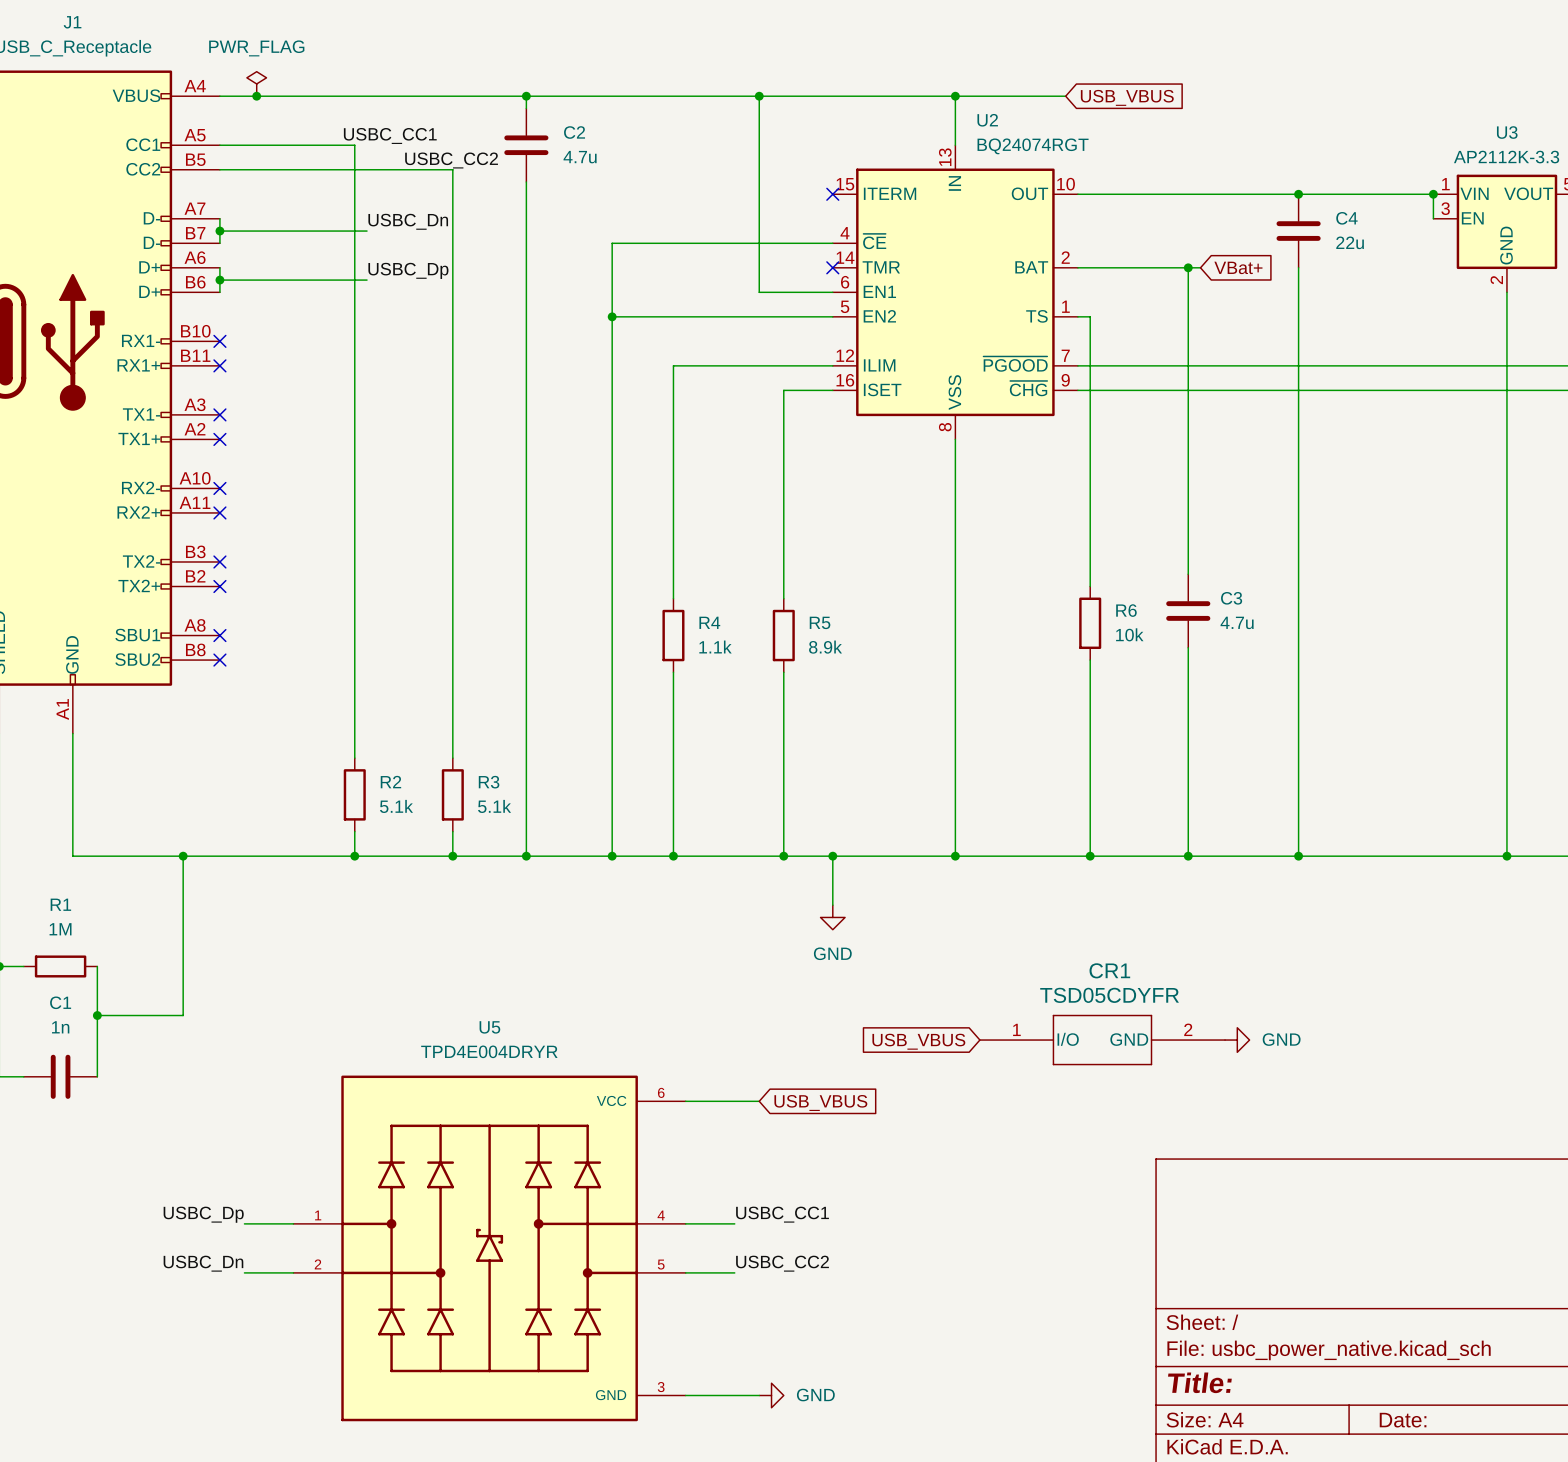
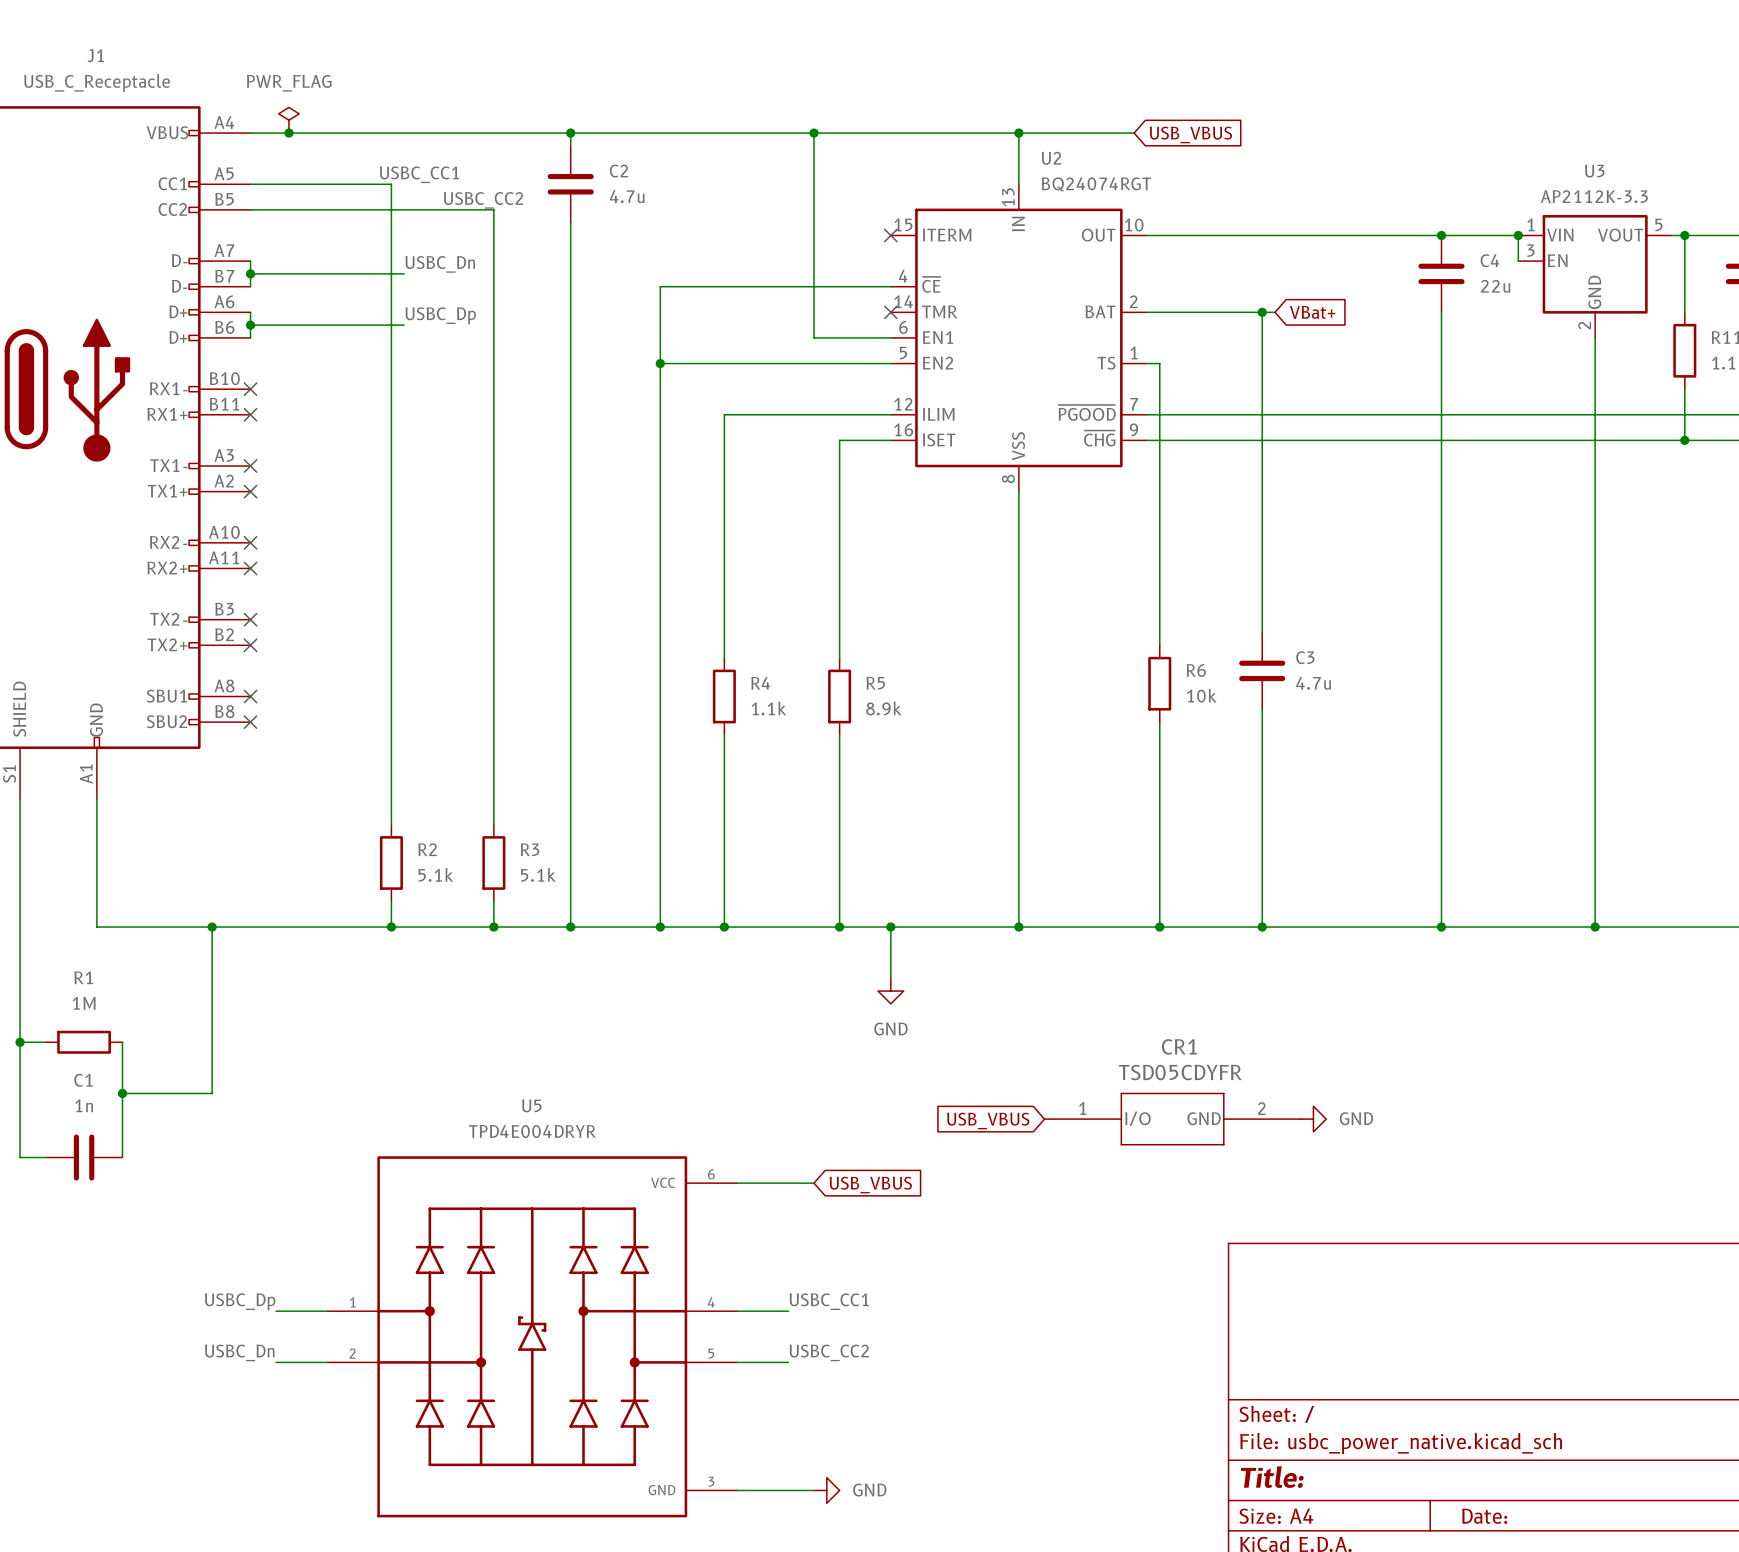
junction: (1298, 194) -> none
junction: none -> (1441, 235)
C4 position: (1298, 231) -> (1441, 273)
wire: (1298, 267) (1298, 856) -> (1441, 312) (1441, 927)
junction: (1298, 856) -> none
junction: none -> (1441, 927)

